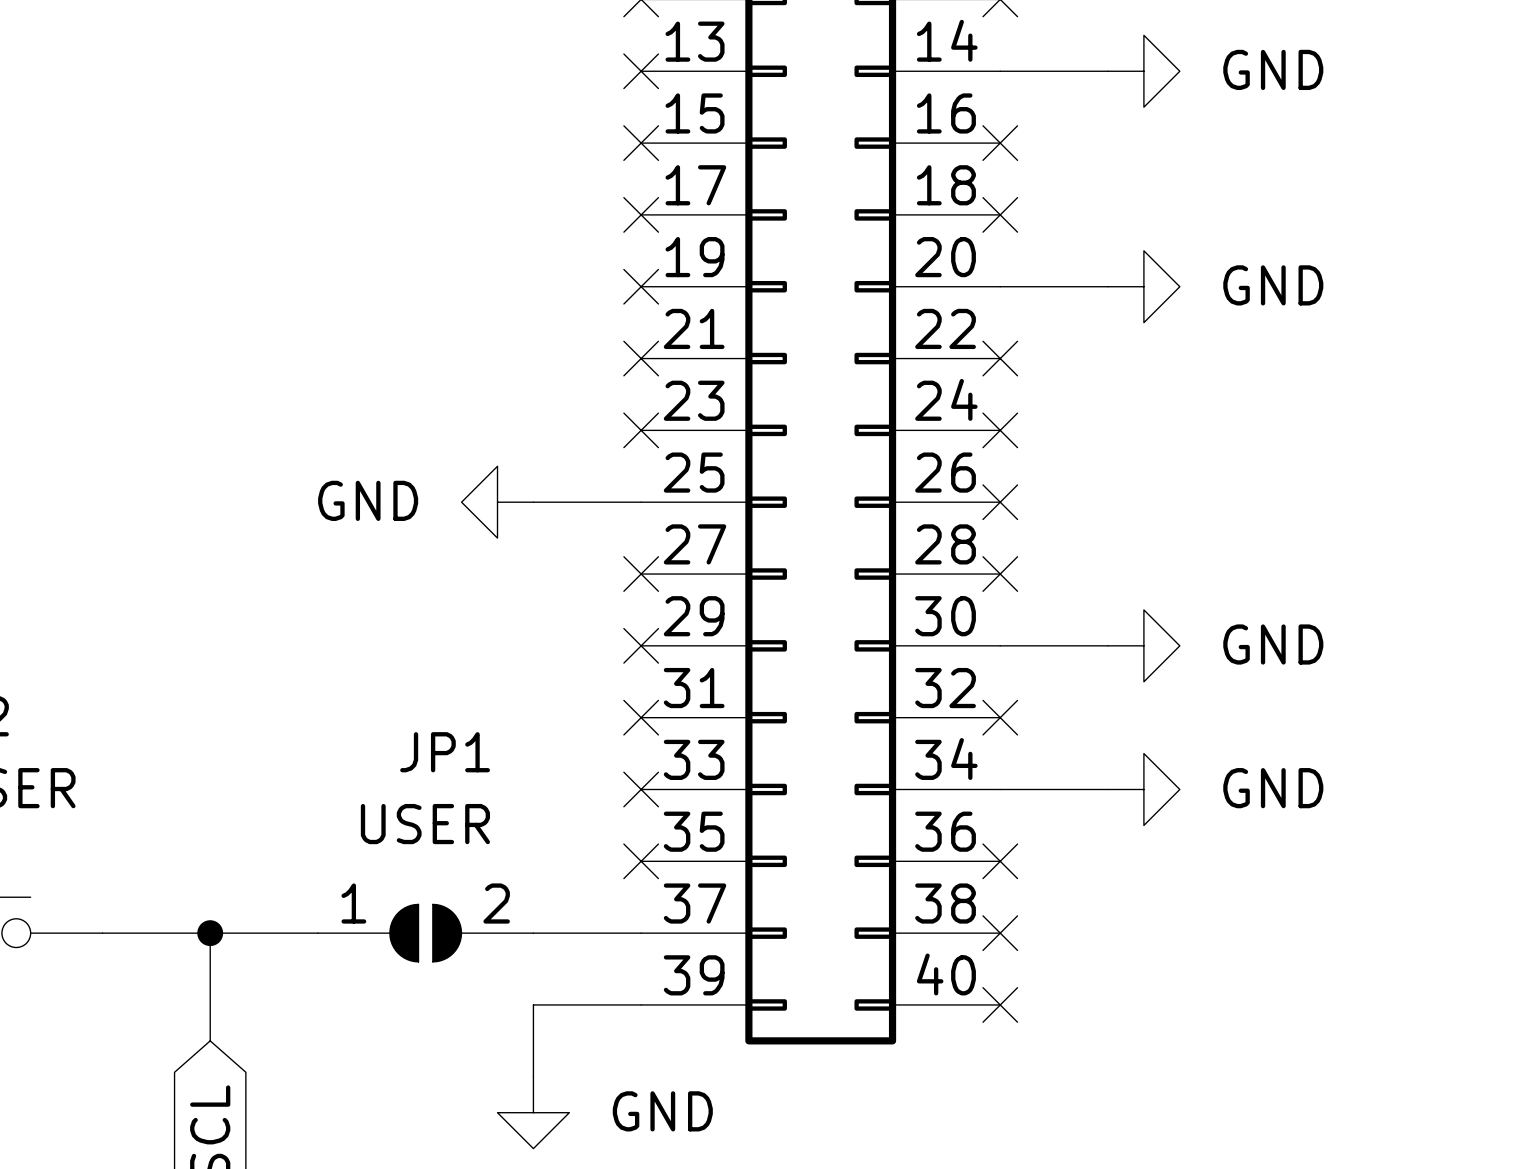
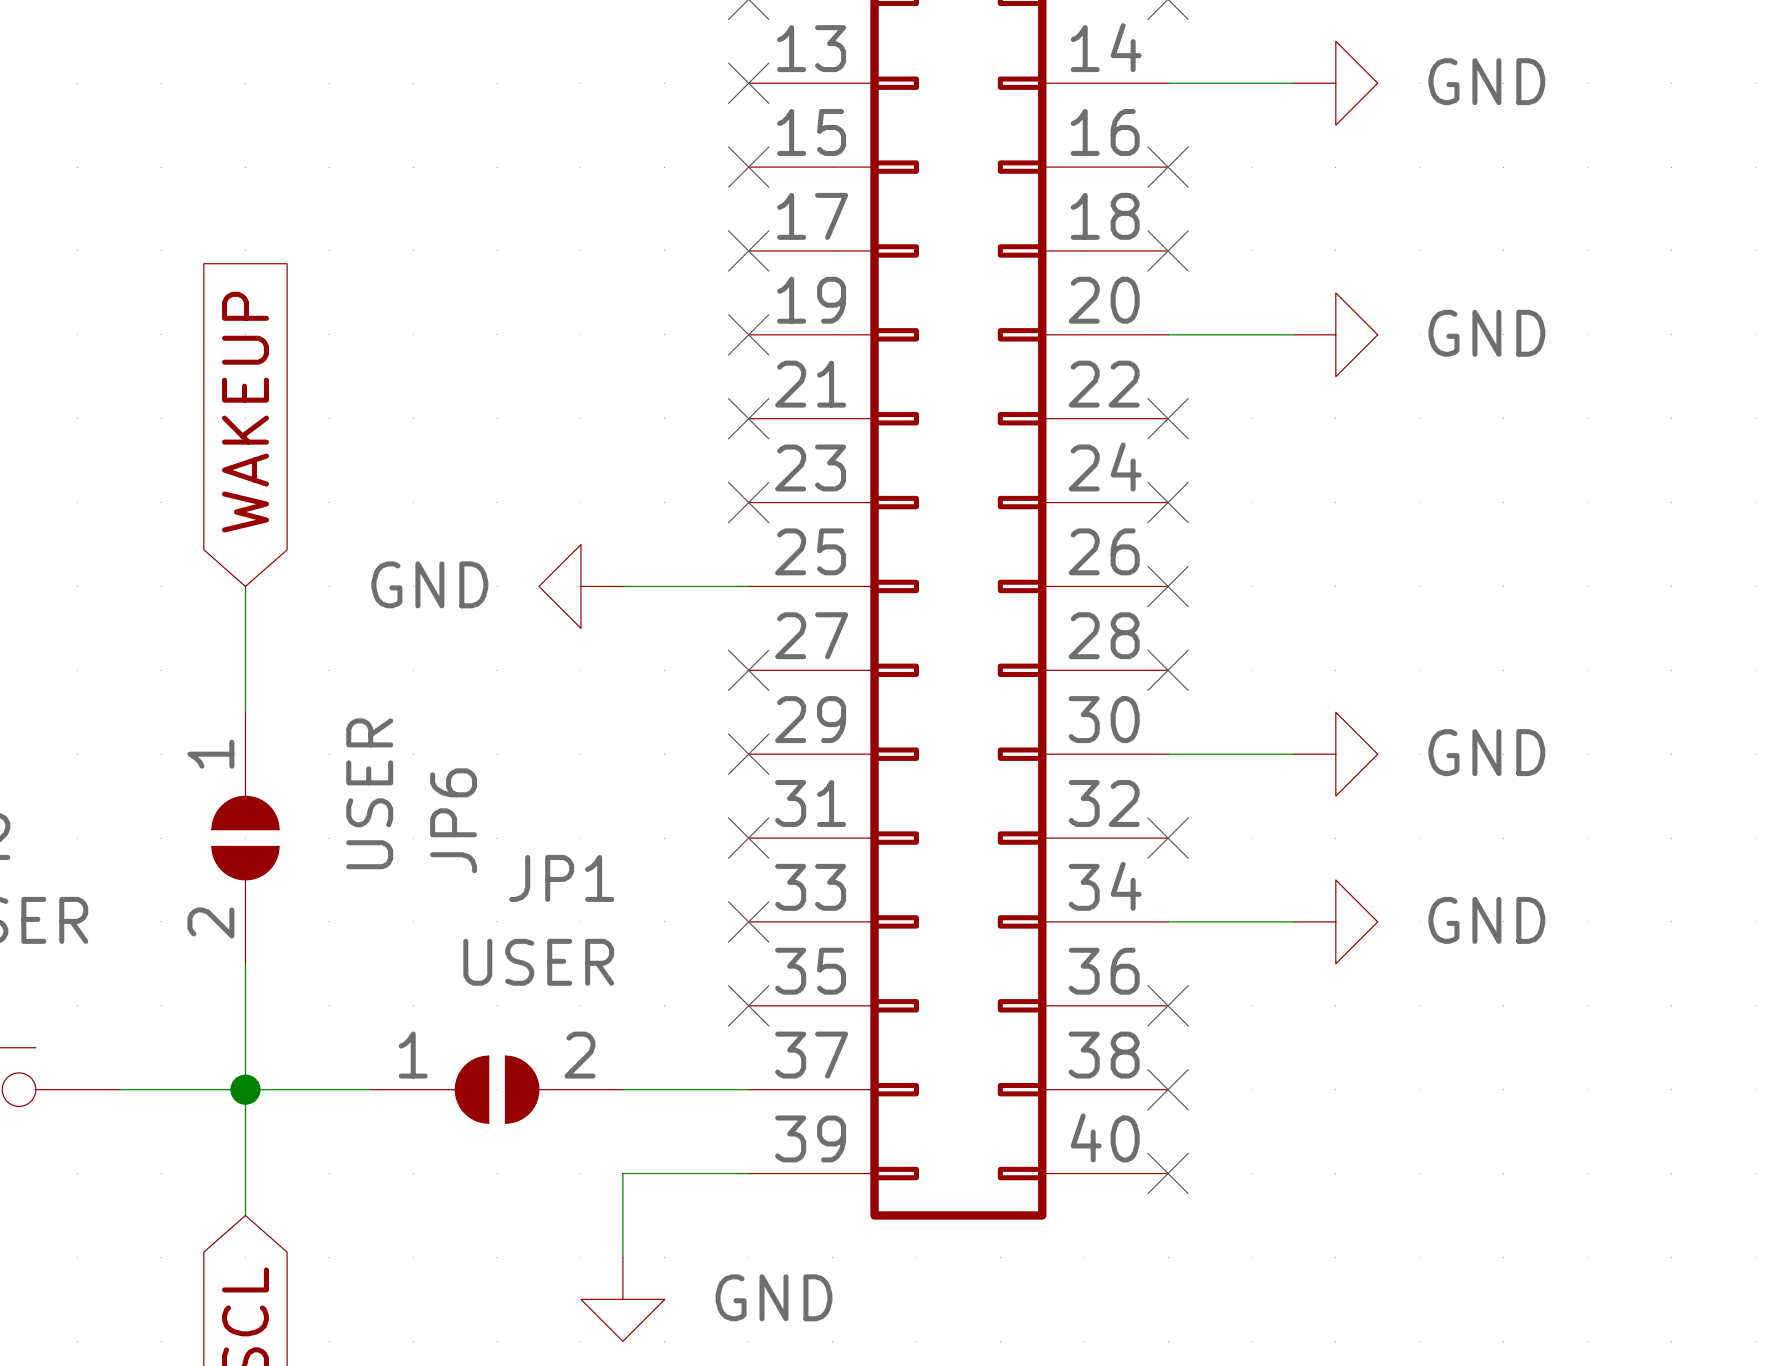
global label: none -> WAKEUP (245, 412)
wire: none -> (245, 586) (245, 712)
JP6: none -> USER (245, 838)
JP1 name position: JP1 (445, 752) -> JP1 (561, 878)
JP1 value position: USER (425, 824) -> USER (538, 962)
wire: none -> (245, 963) (245, 1089)

